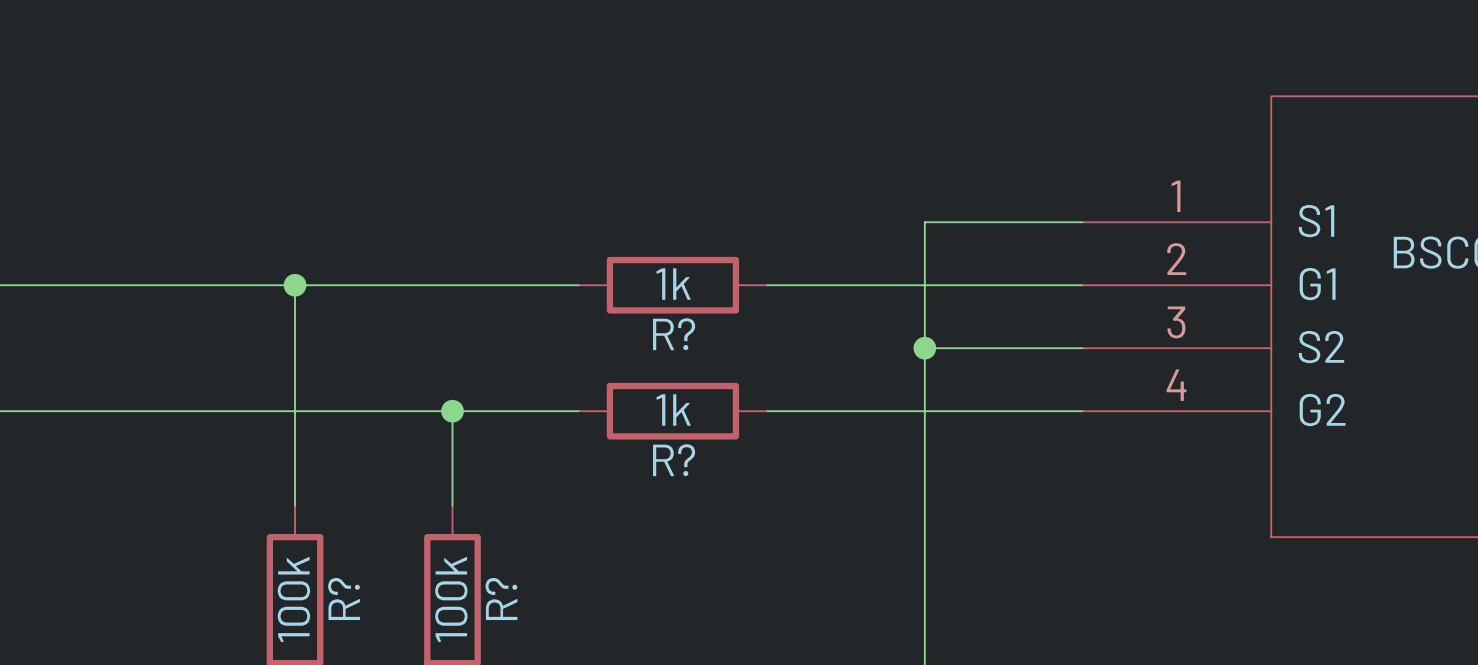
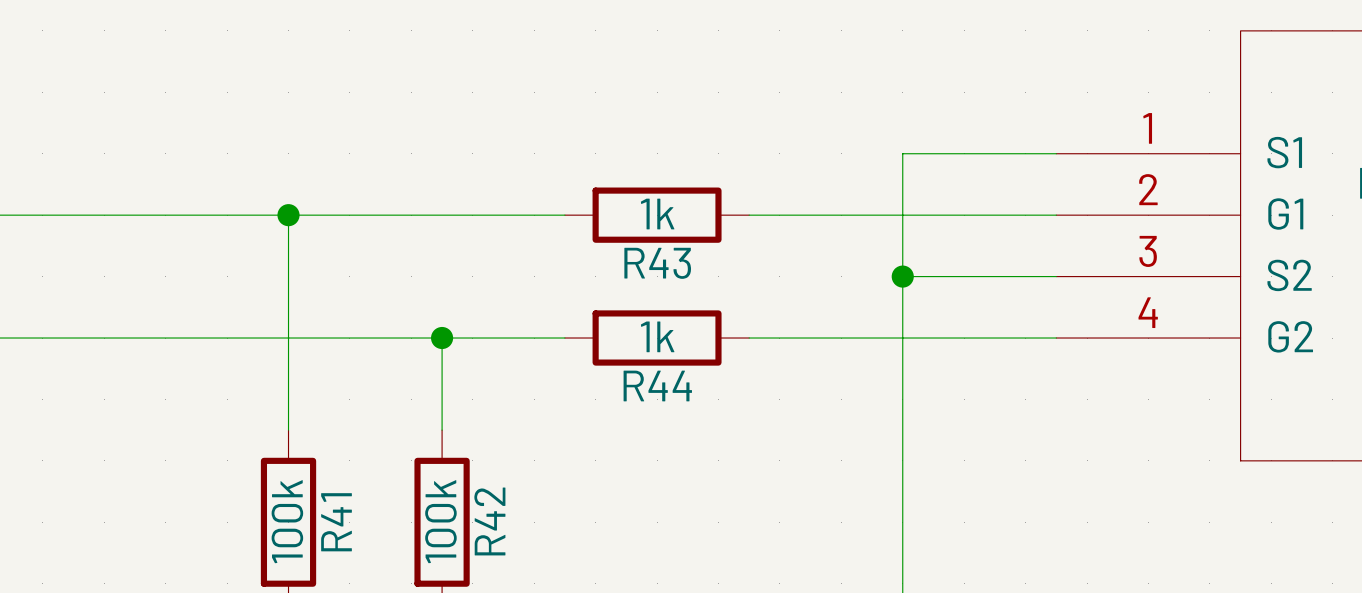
R? name: R? (674, 334) -> R43 (657, 263)
R? name: R? (674, 460) -> R44 (657, 386)
R? name: R? (344, 598) -> R41 (336, 522)
R? name: R? (501, 598) -> R42 (489, 521)

